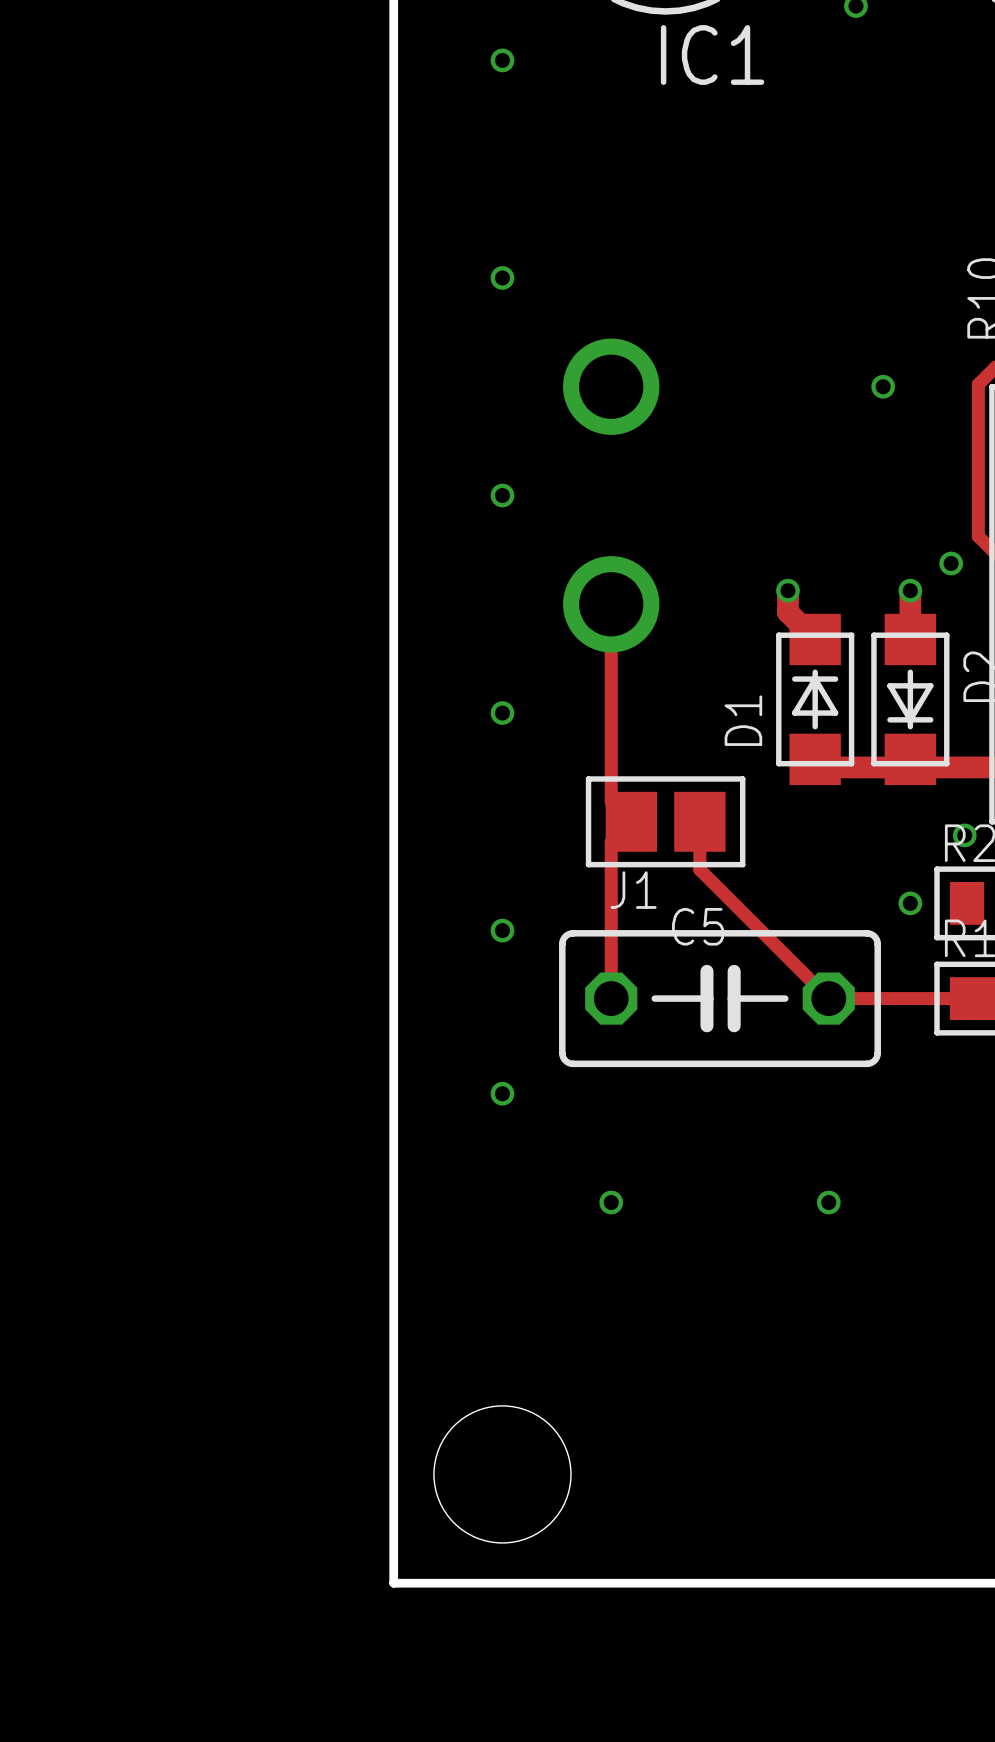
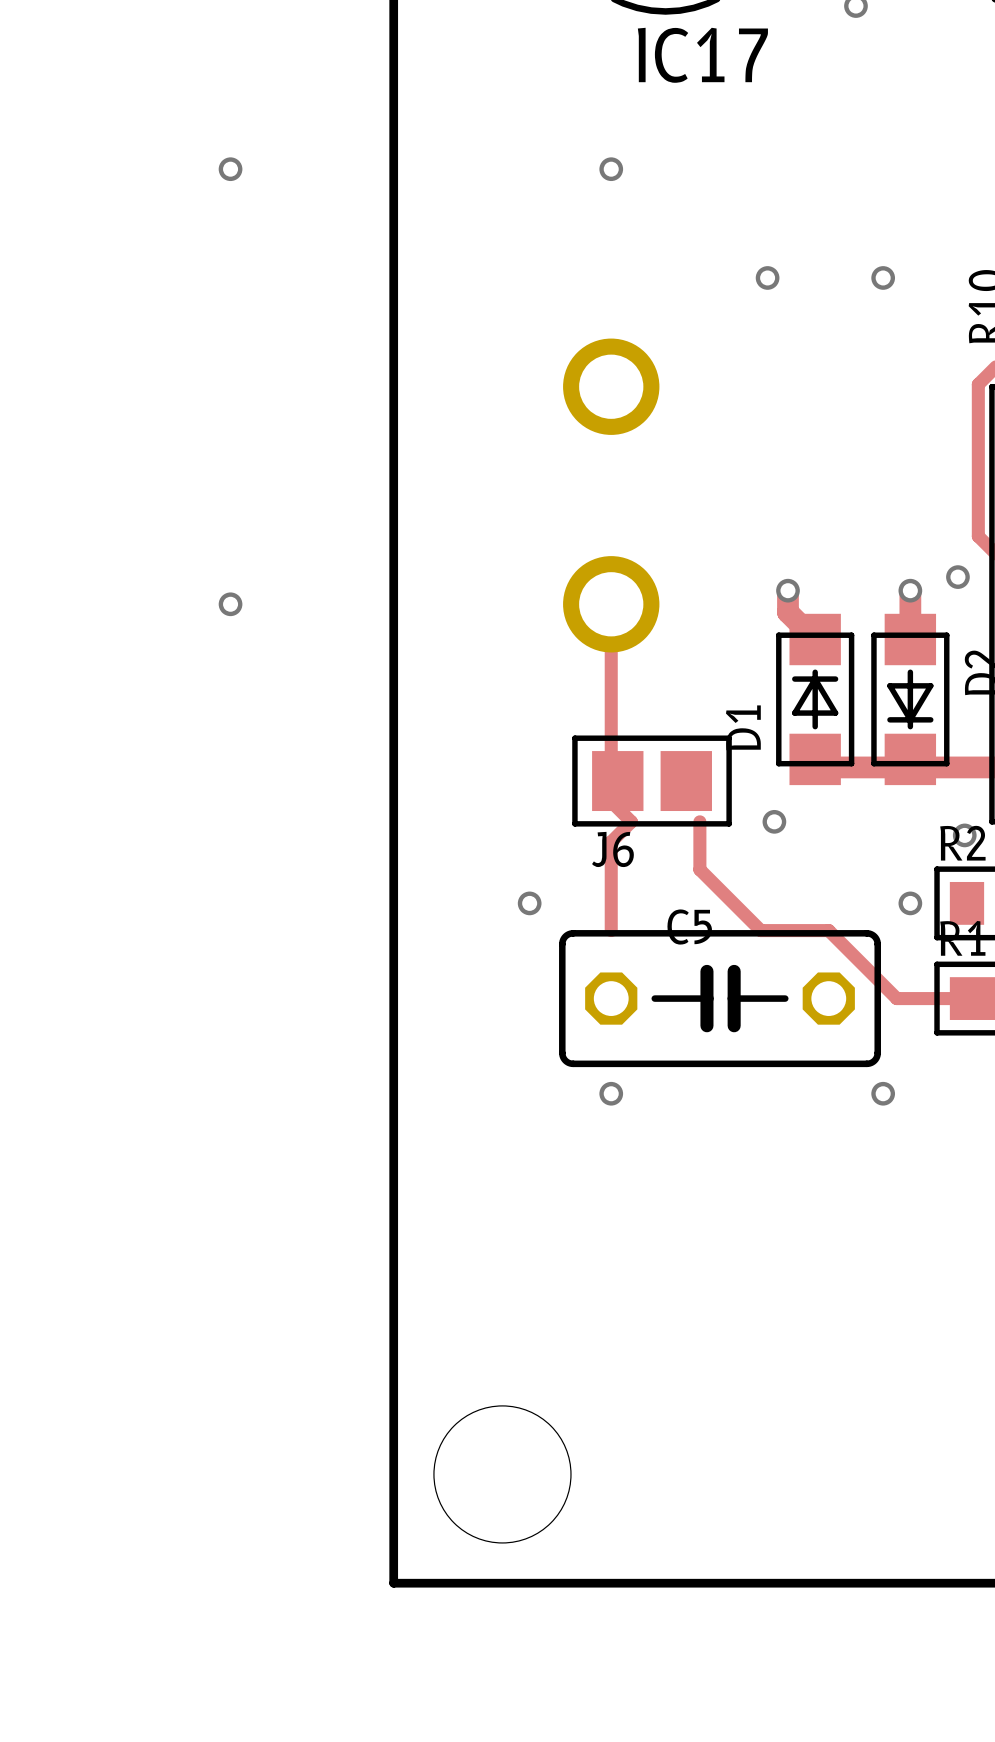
IC1 name: IC1 (712, 54) -> IC17 (702, 55)
via: (502, 60) -> none
via: none -> (230, 169)
via: none -> (611, 169)
via: (502, 277) -> none
via: none -> (767, 277)
via: none -> (883, 277)
via: (883, 386) -> none
via: (502, 495) -> none
via position: (951, 563) -> (957, 577)
via: none -> (230, 604)
via: (502, 713) -> none
J6: none -> (652, 781)
J1: (665, 821) -> none
via: none -> (774, 821)
via position: (502, 930) -> (529, 903)
track: (611, 930) (611, 998) -> none
track: (760, 930) (828, 998) (896, 998) -> (760, 930) (828, 930) (896, 998)
via: (502, 1093) -> none
via: none -> (611, 1093)
via: none -> (883, 1093)
via: (611, 1202) -> none
via: (828, 1202) -> none

